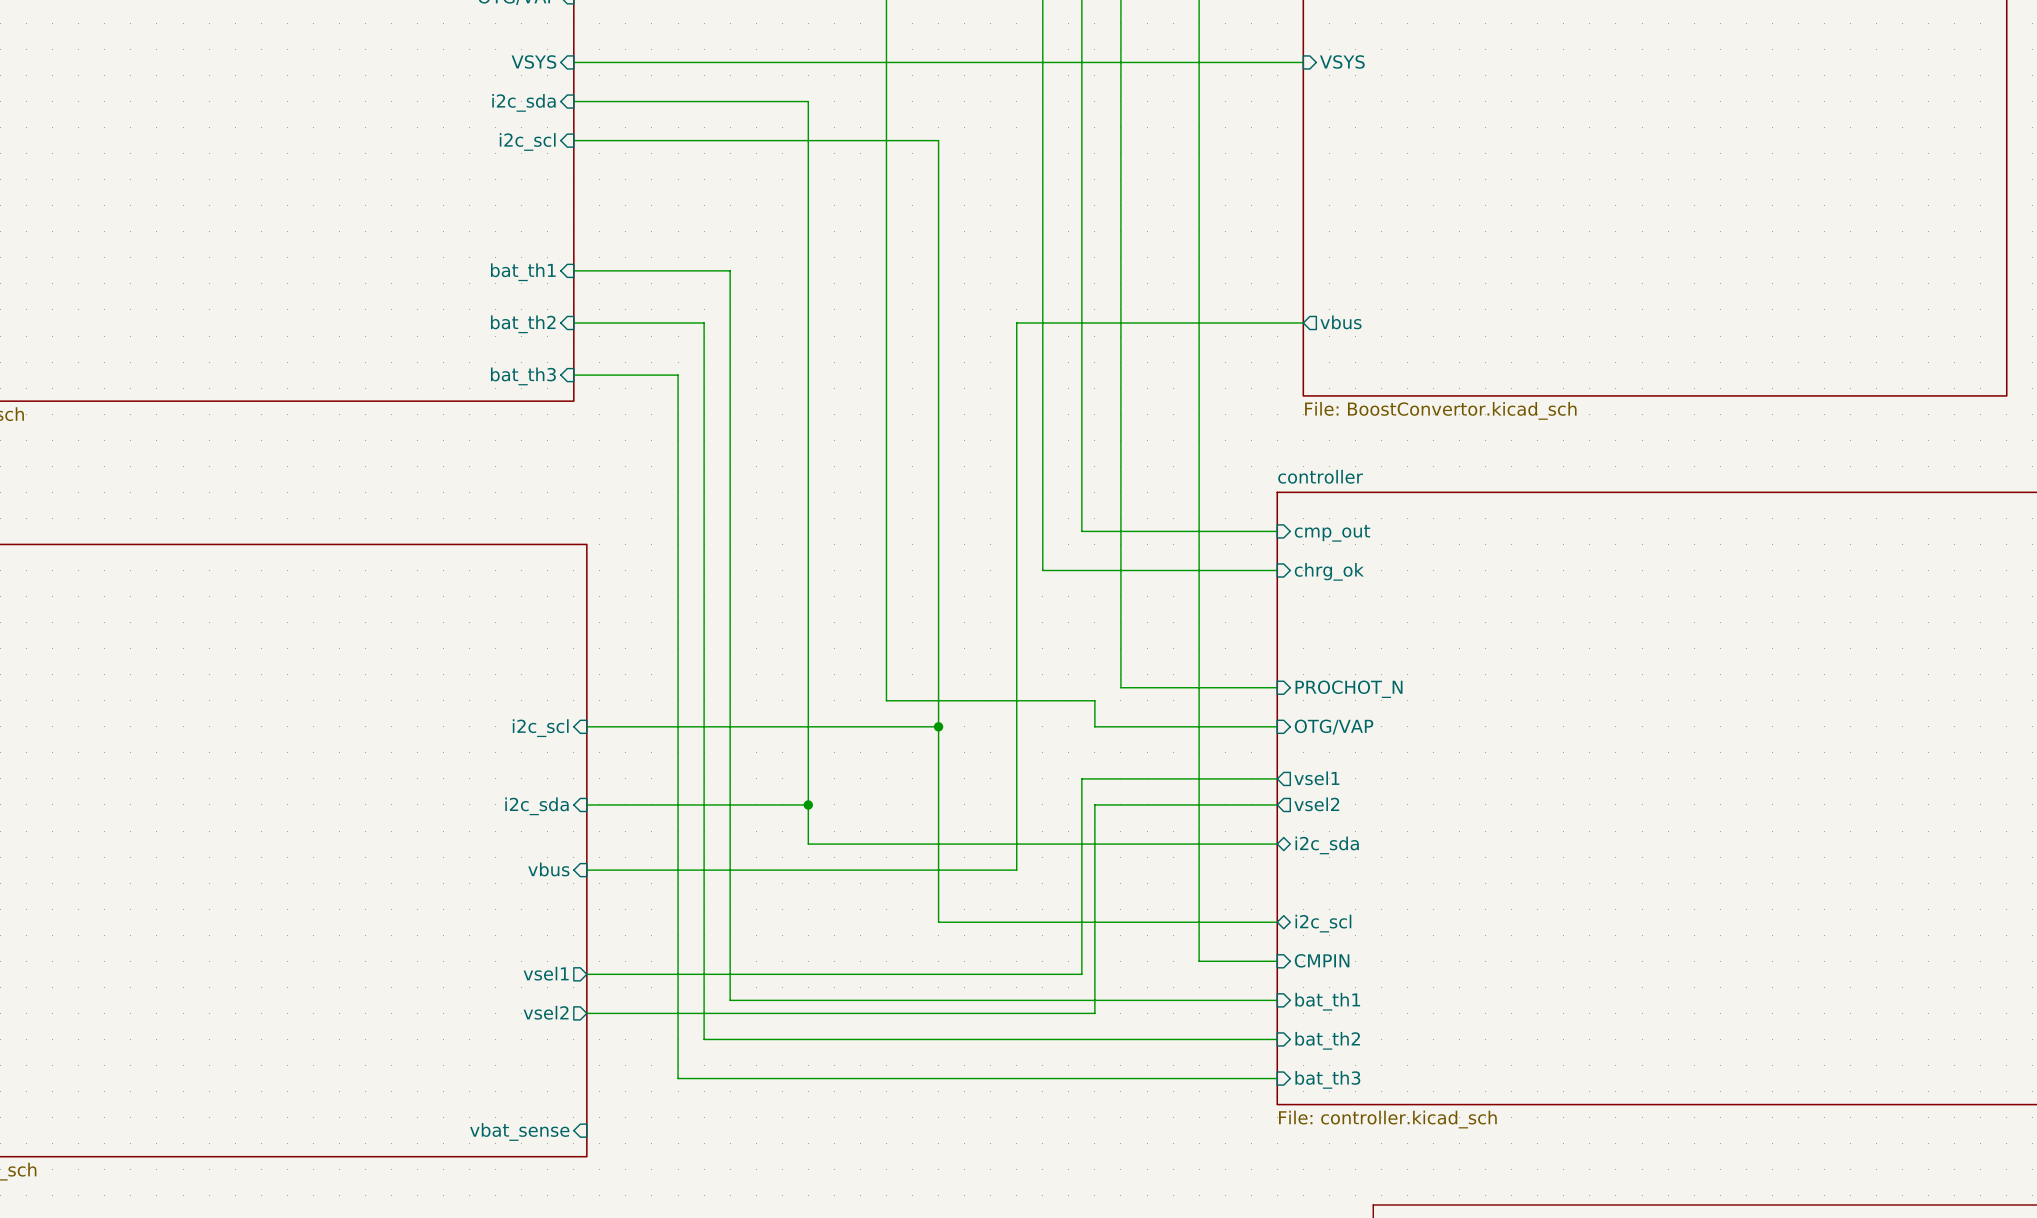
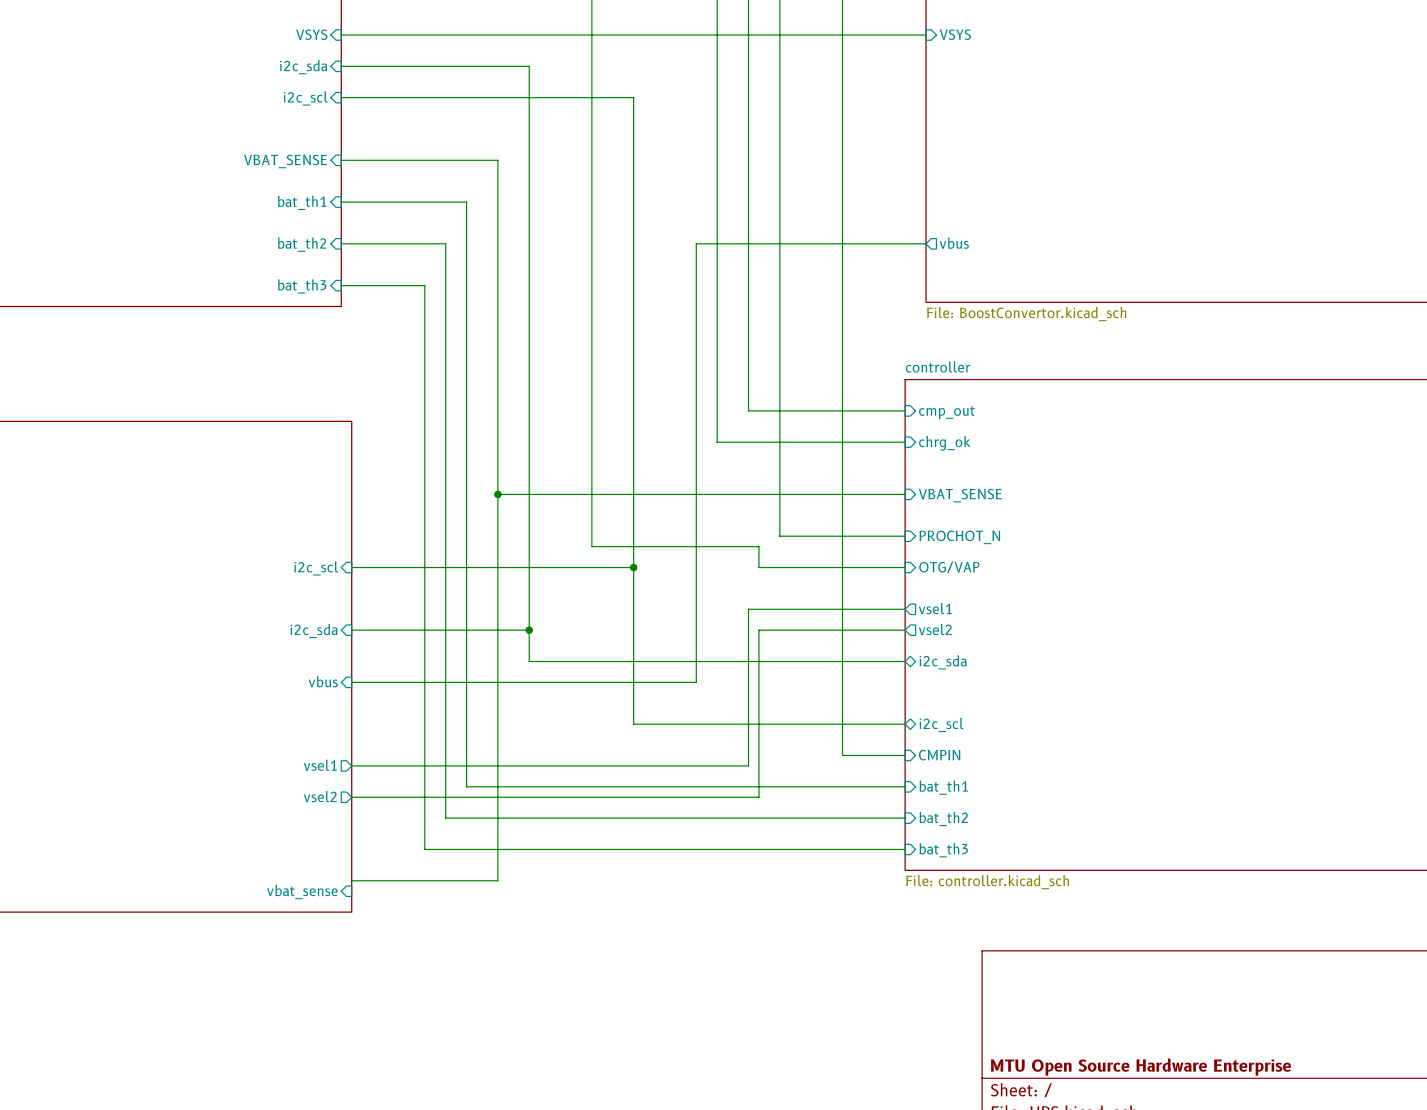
wire: none -> (341, 160) (497, 160) (497, 880) (351, 880)
sheet pin: none -> VBAT_SENSE (285, 161)
wire: none -> (497, 494) (905, 494)
junction: none -> (497, 494)
sheet pin: none -> VBAT_SENSE (960, 495)

